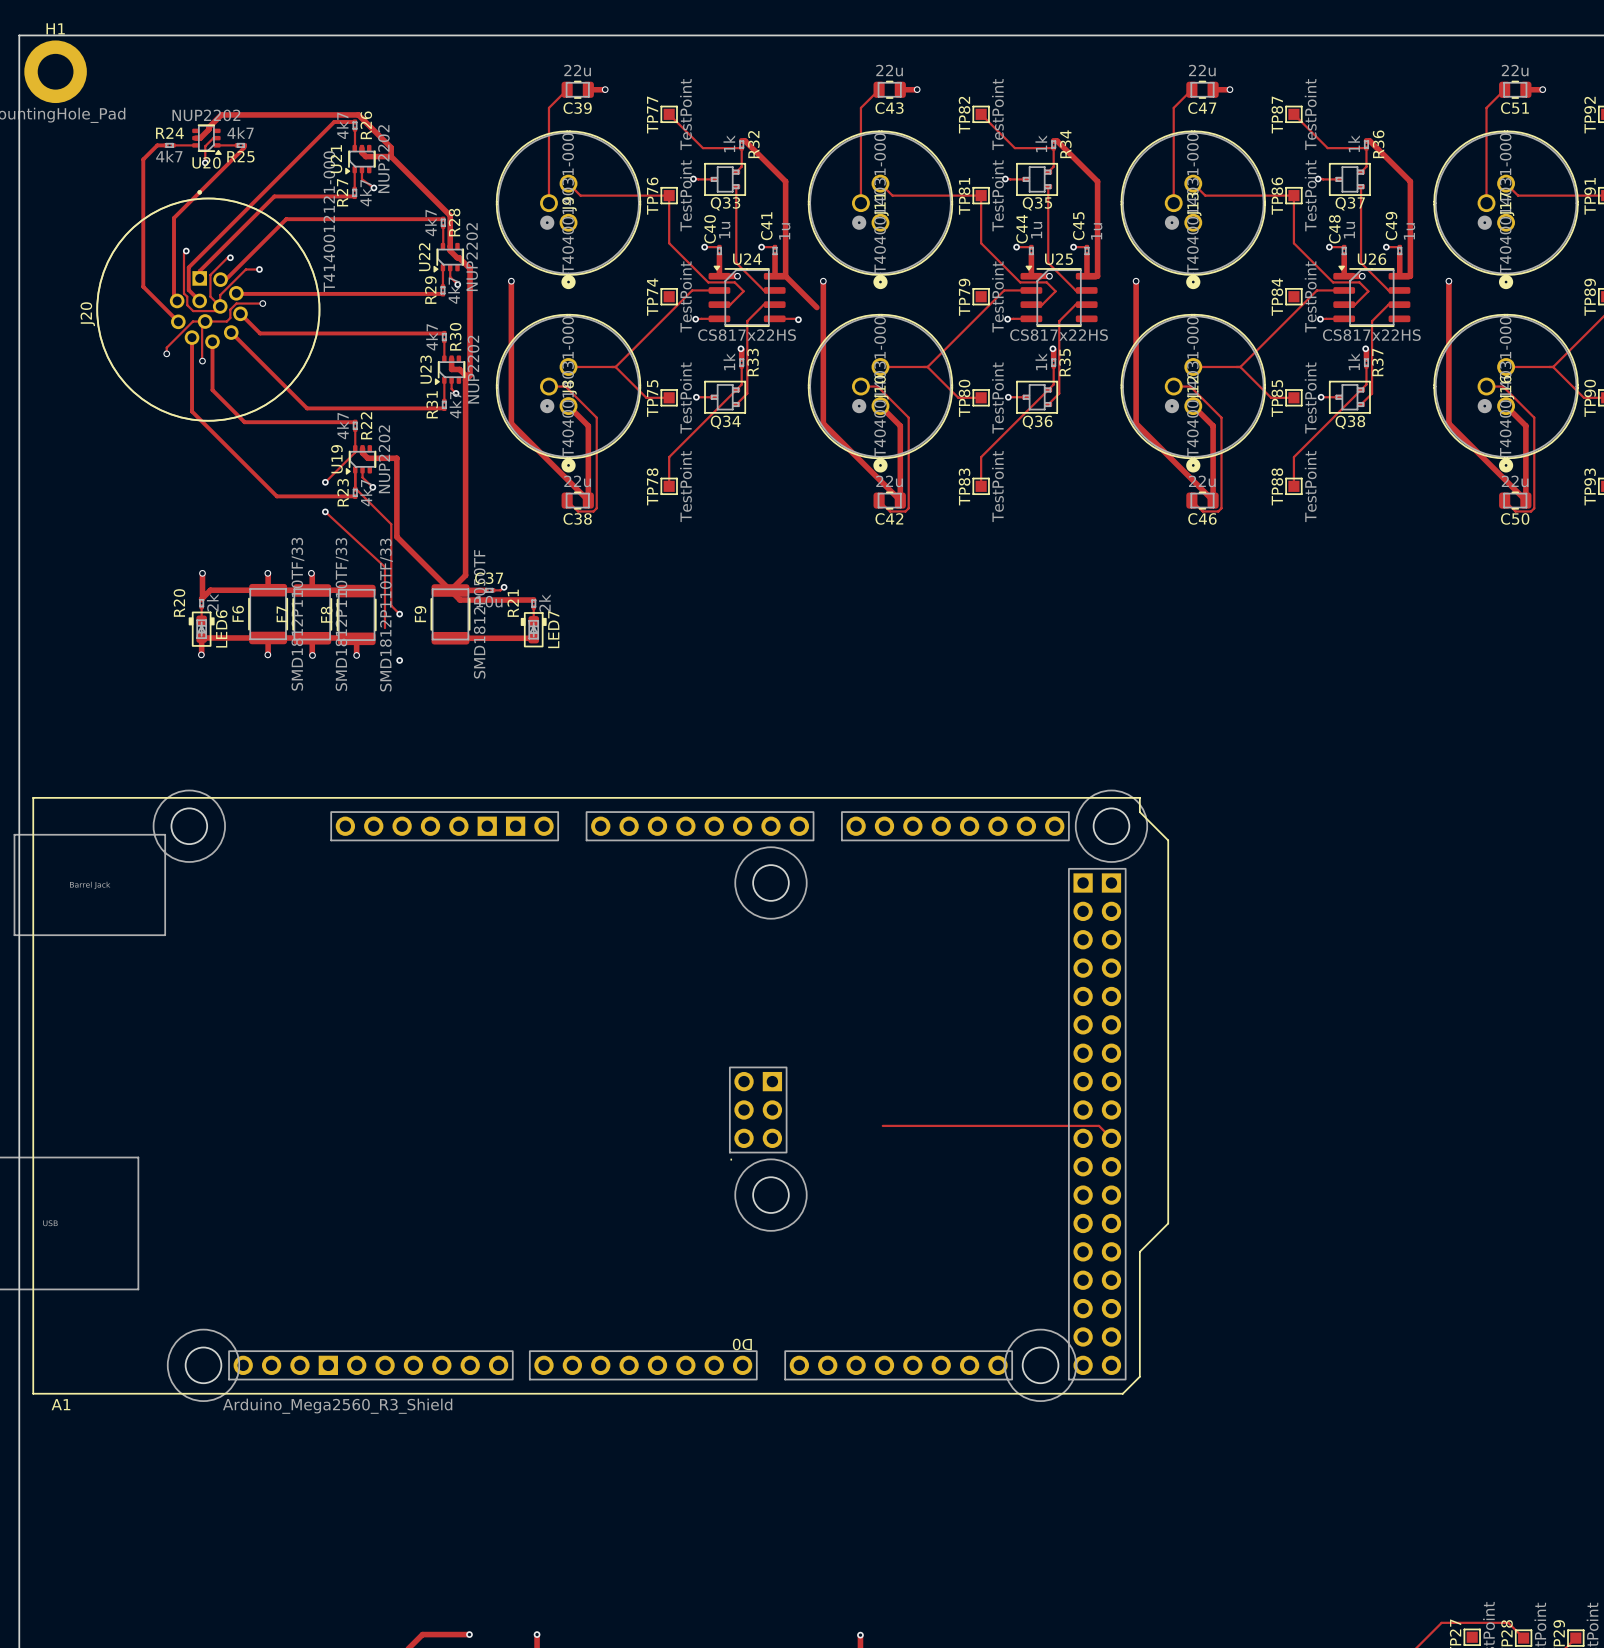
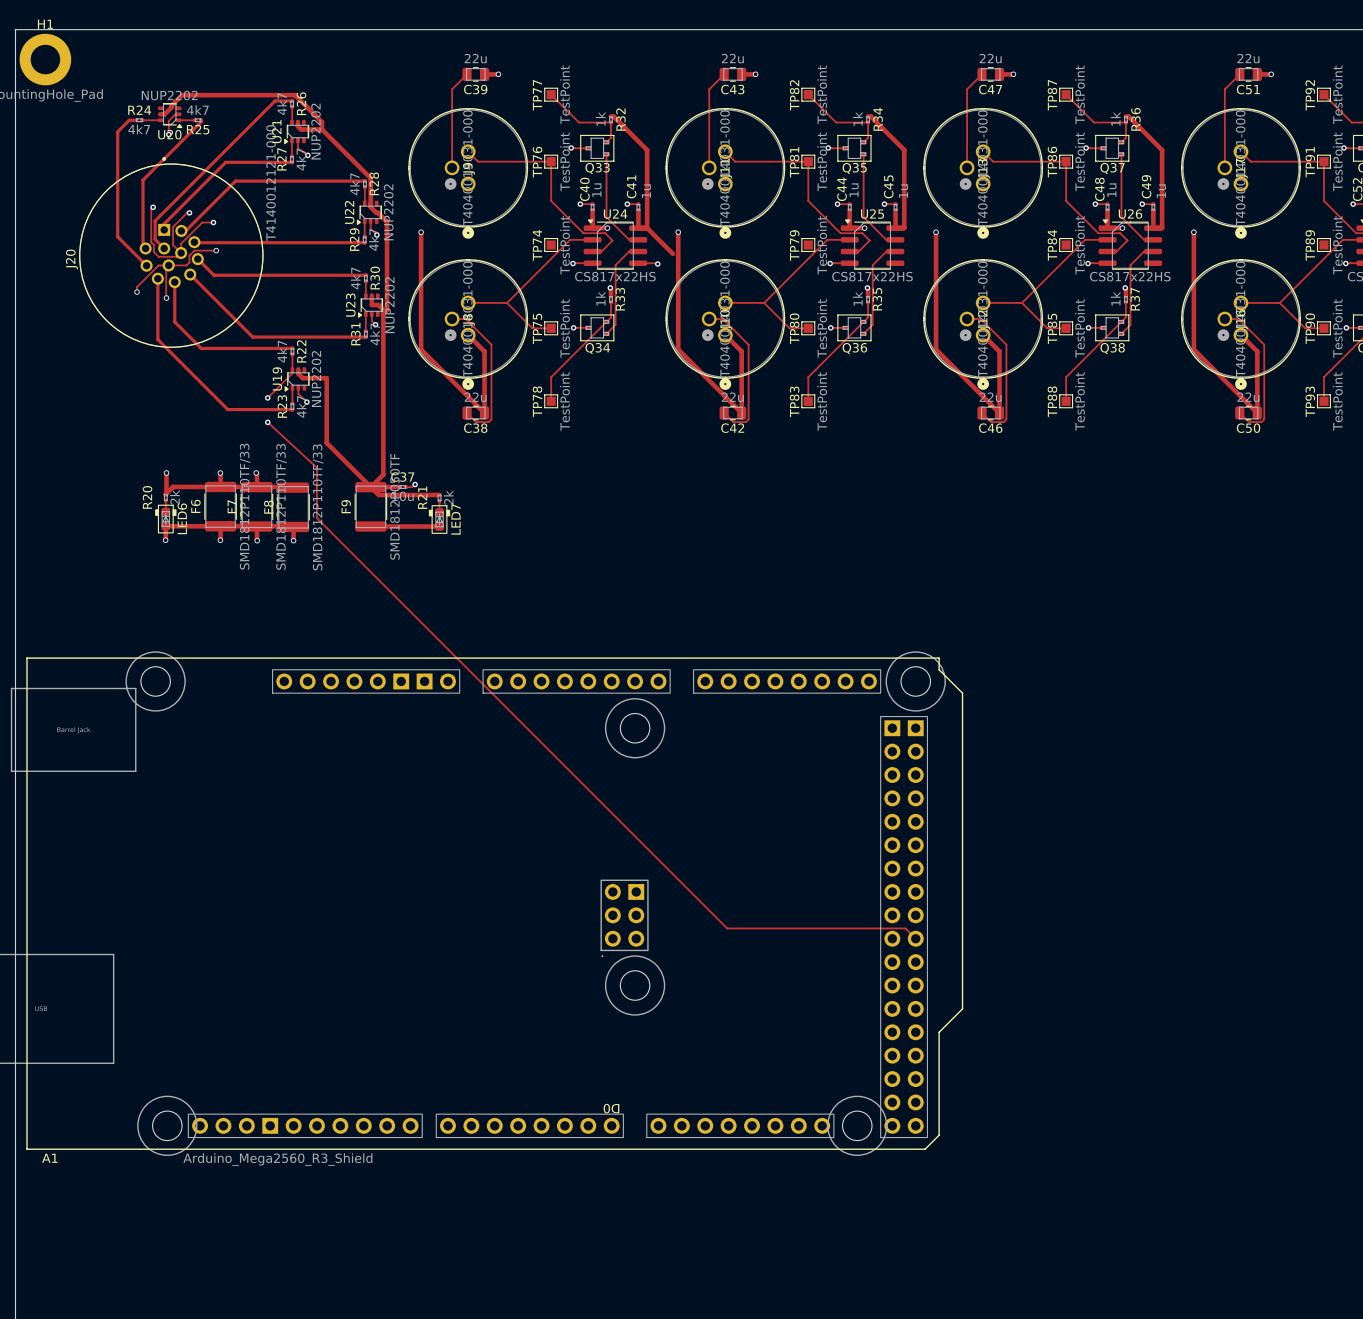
track: (355, 488) (391, 524) (391, 605) (399, 614) -> none
via: (399, 614) -> none
track: none -> (316, 518) (727, 928)
via: (399, 660) -> none

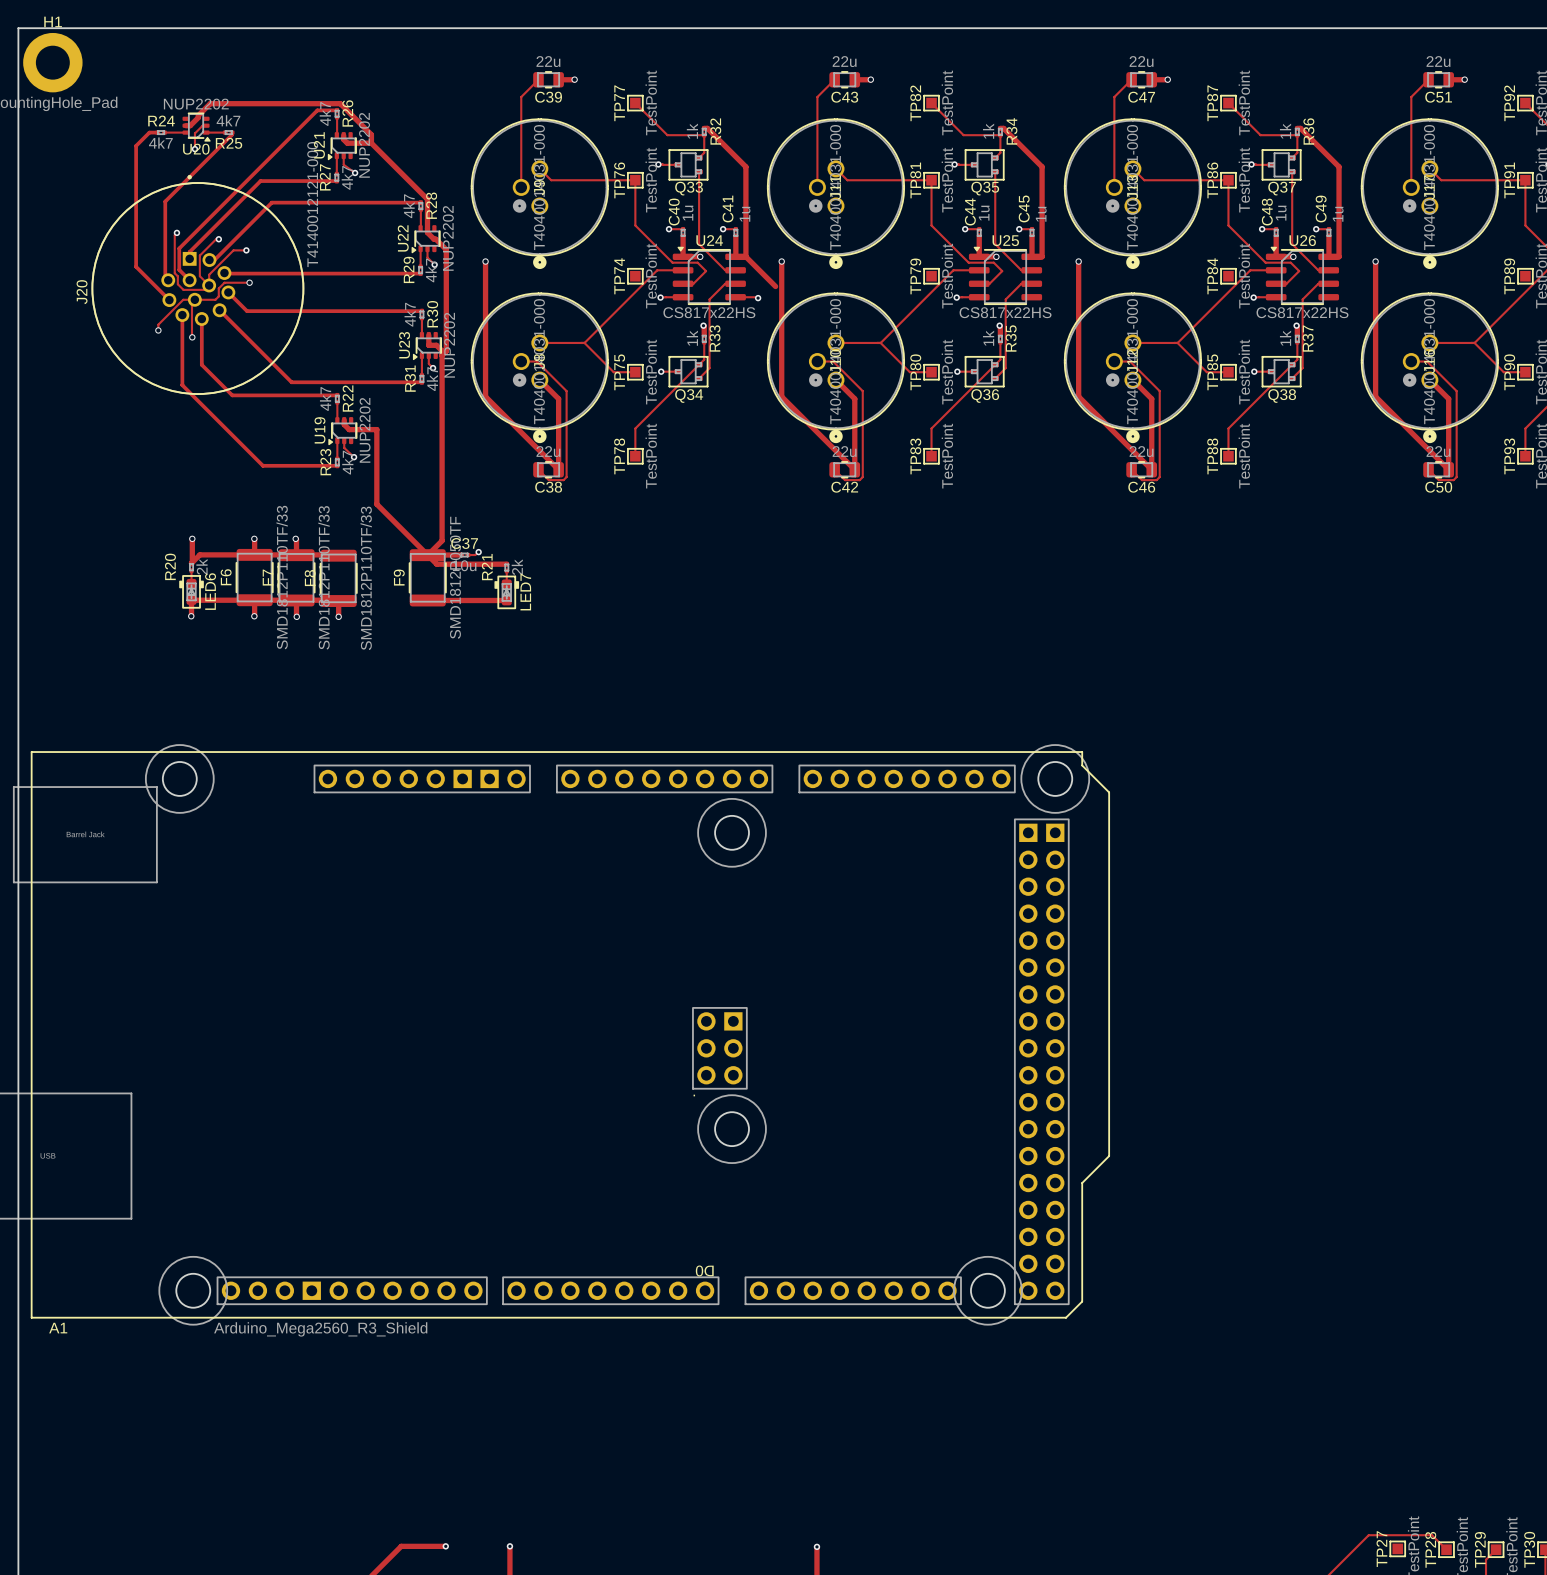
track: (292, 370) (292, 373) (267, 397) -> none
via: (267, 397) -> none
track: (267, 422) (316, 467) (316, 518) (727, 928) (905, 928) (915, 938) -> none
via: (267, 422) -> none

